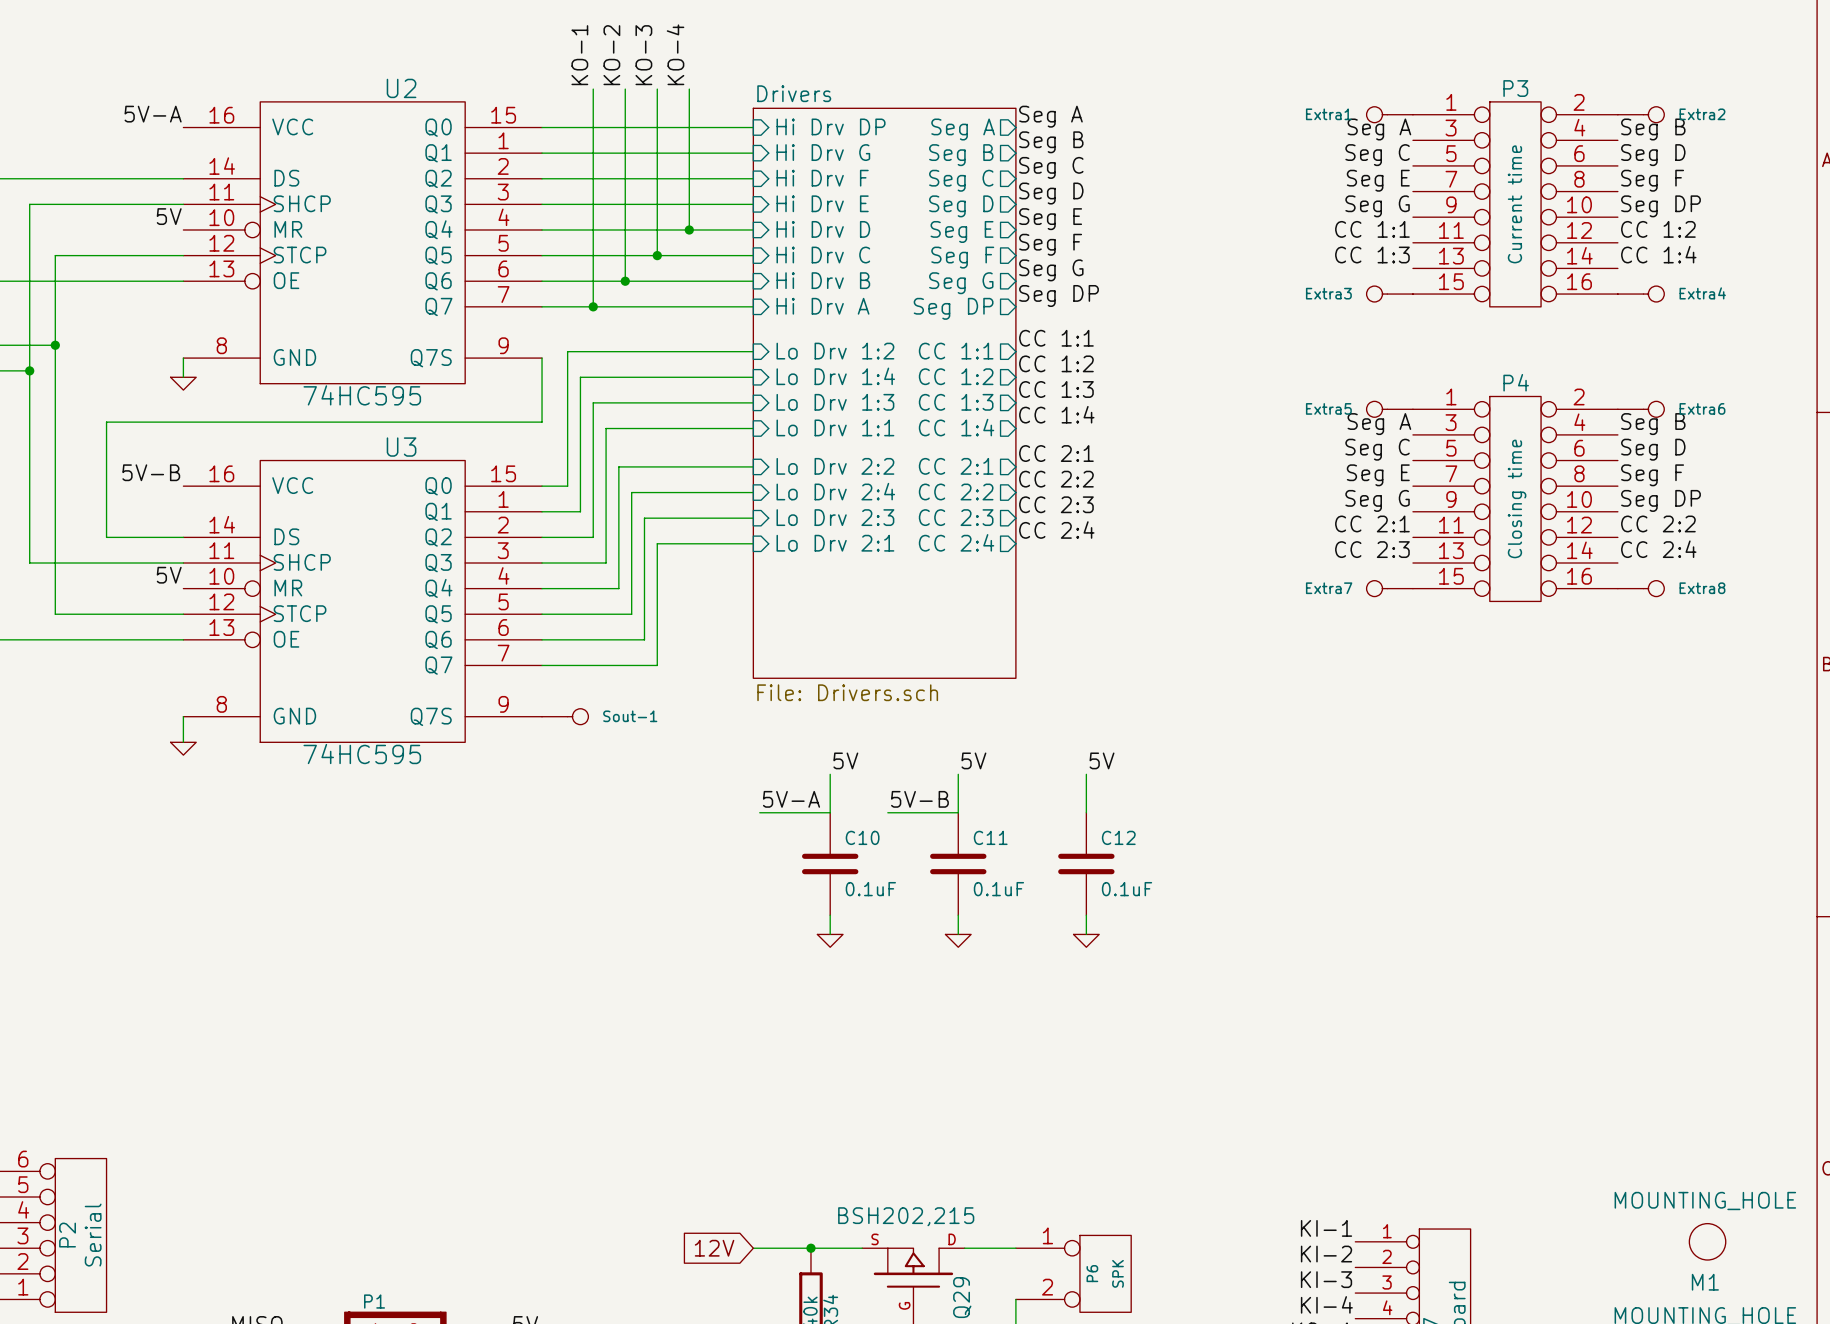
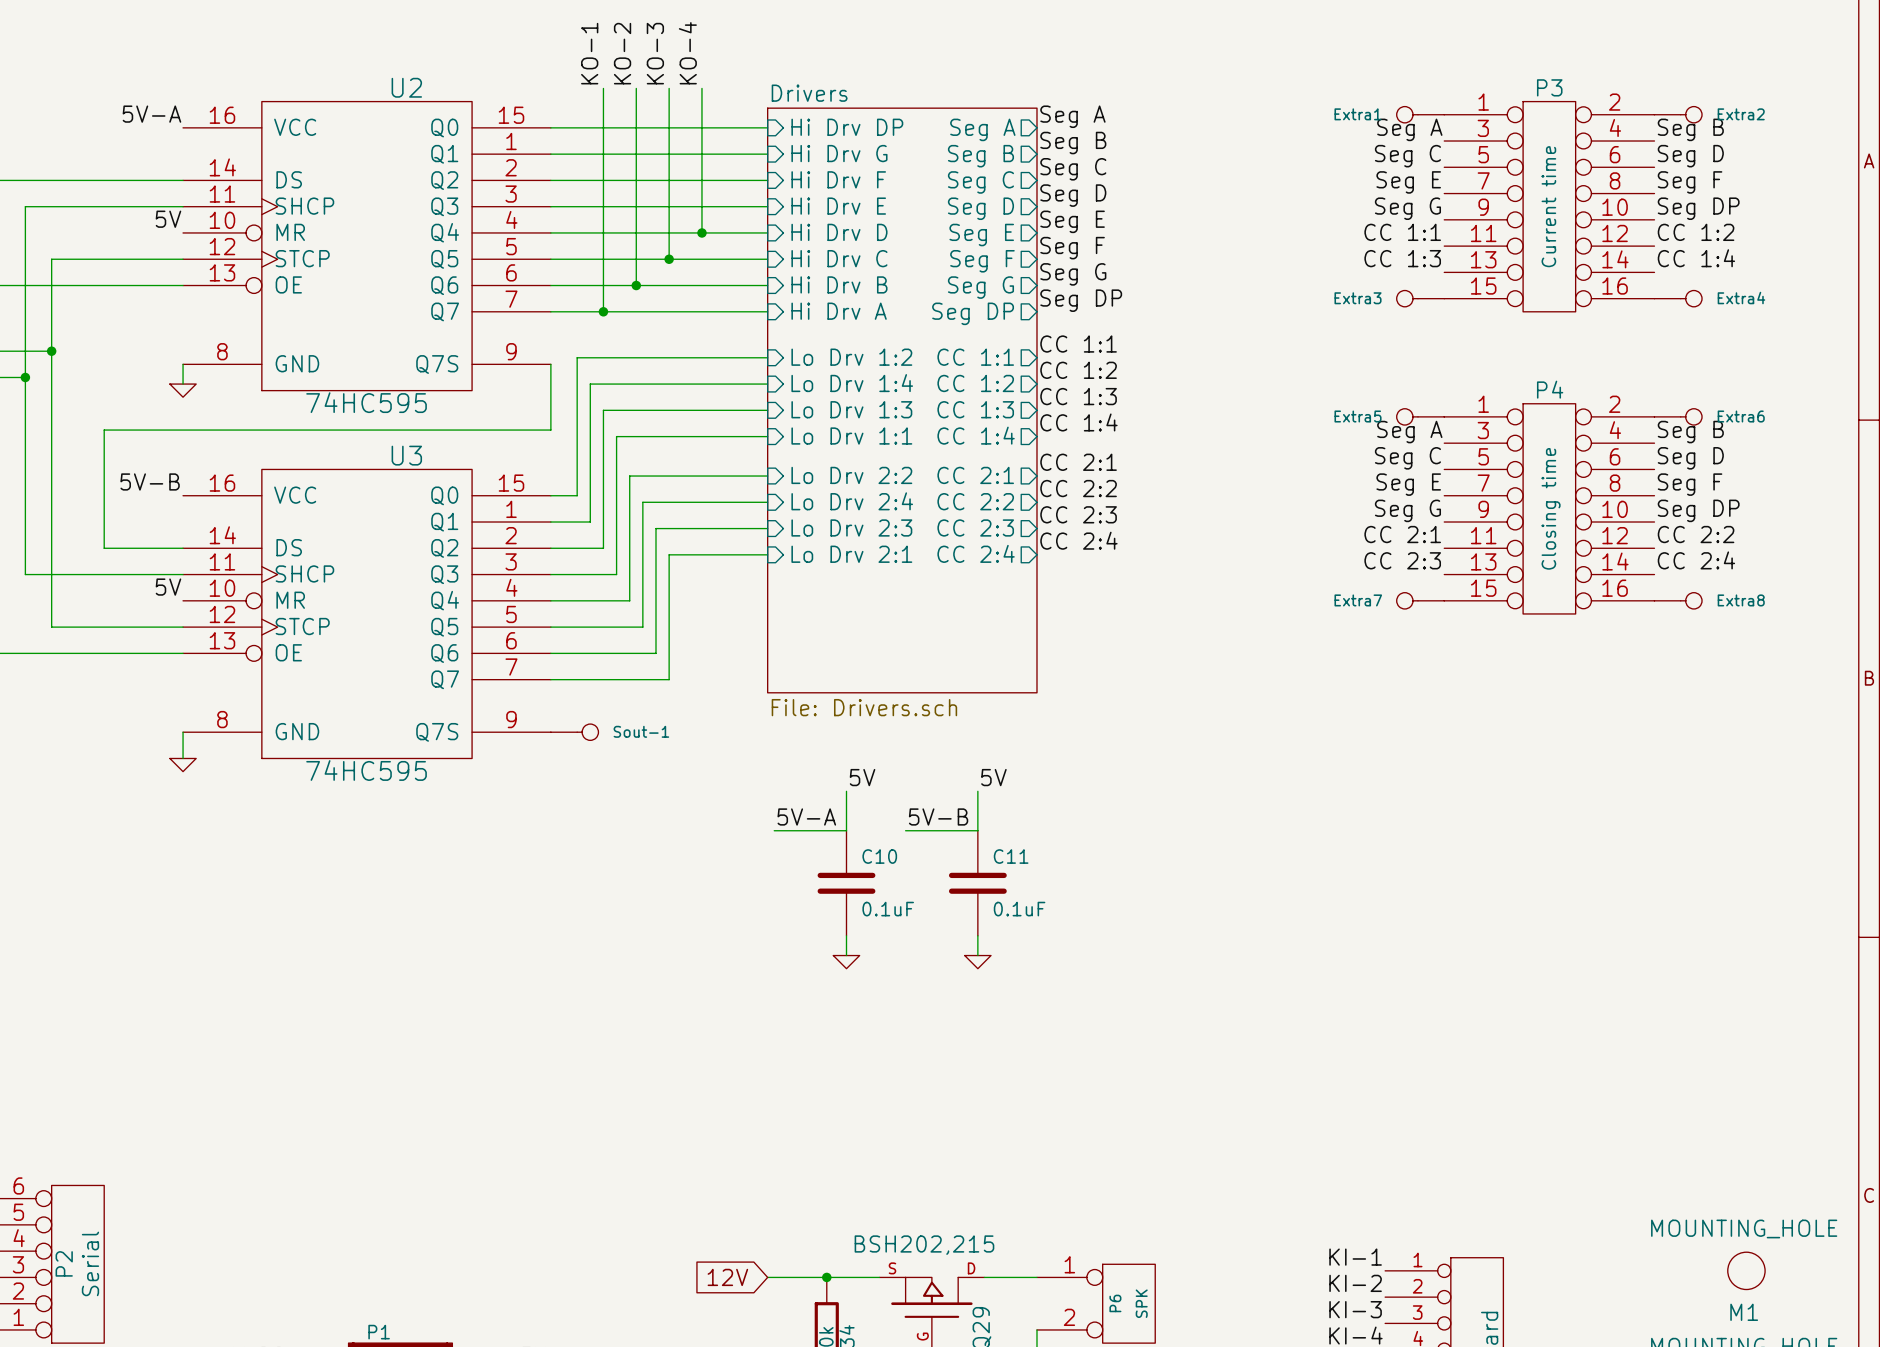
label: 5V (1102, 760) -> none
wire: (1086, 774) (1086, 812) -> none
C12: 0.1uF (1086, 863) -> none
wire: (1086, 915) (1086, 934) -> none
power symbol: (1086, 940) -> none

